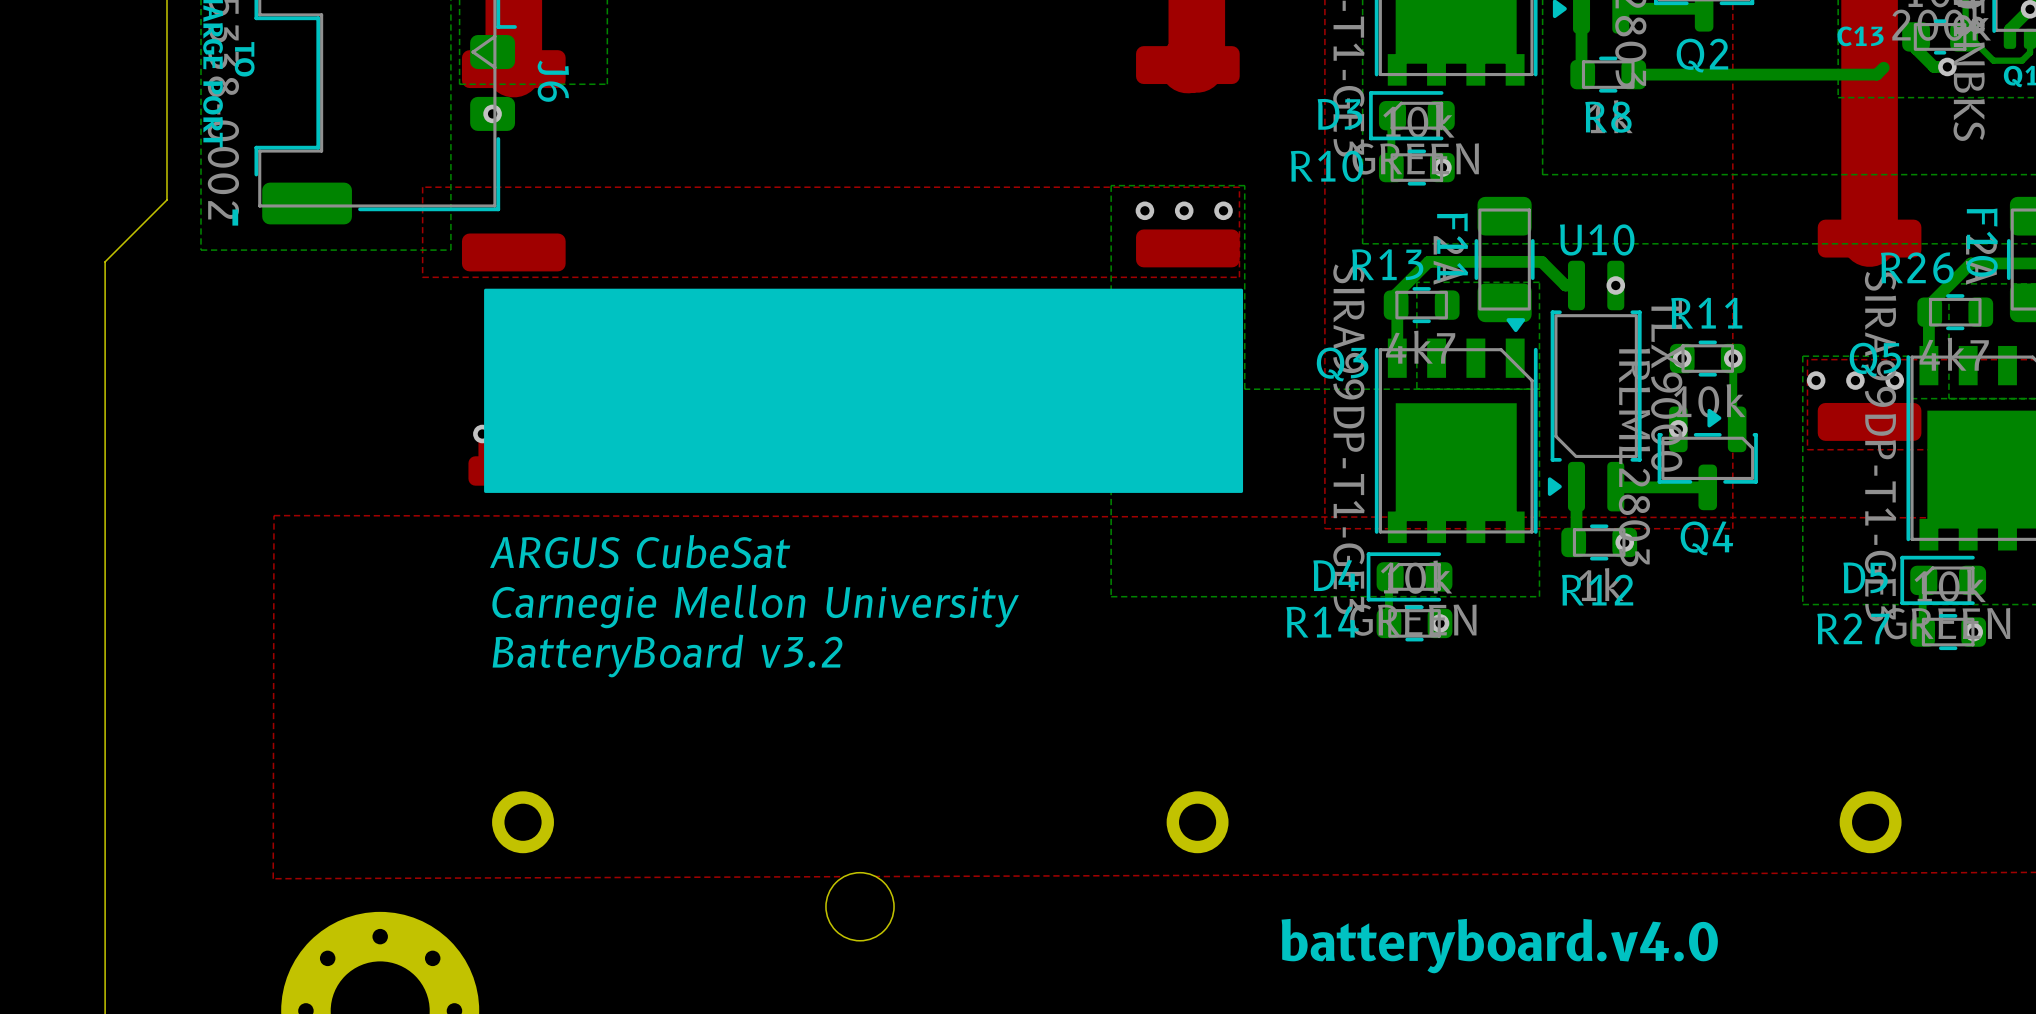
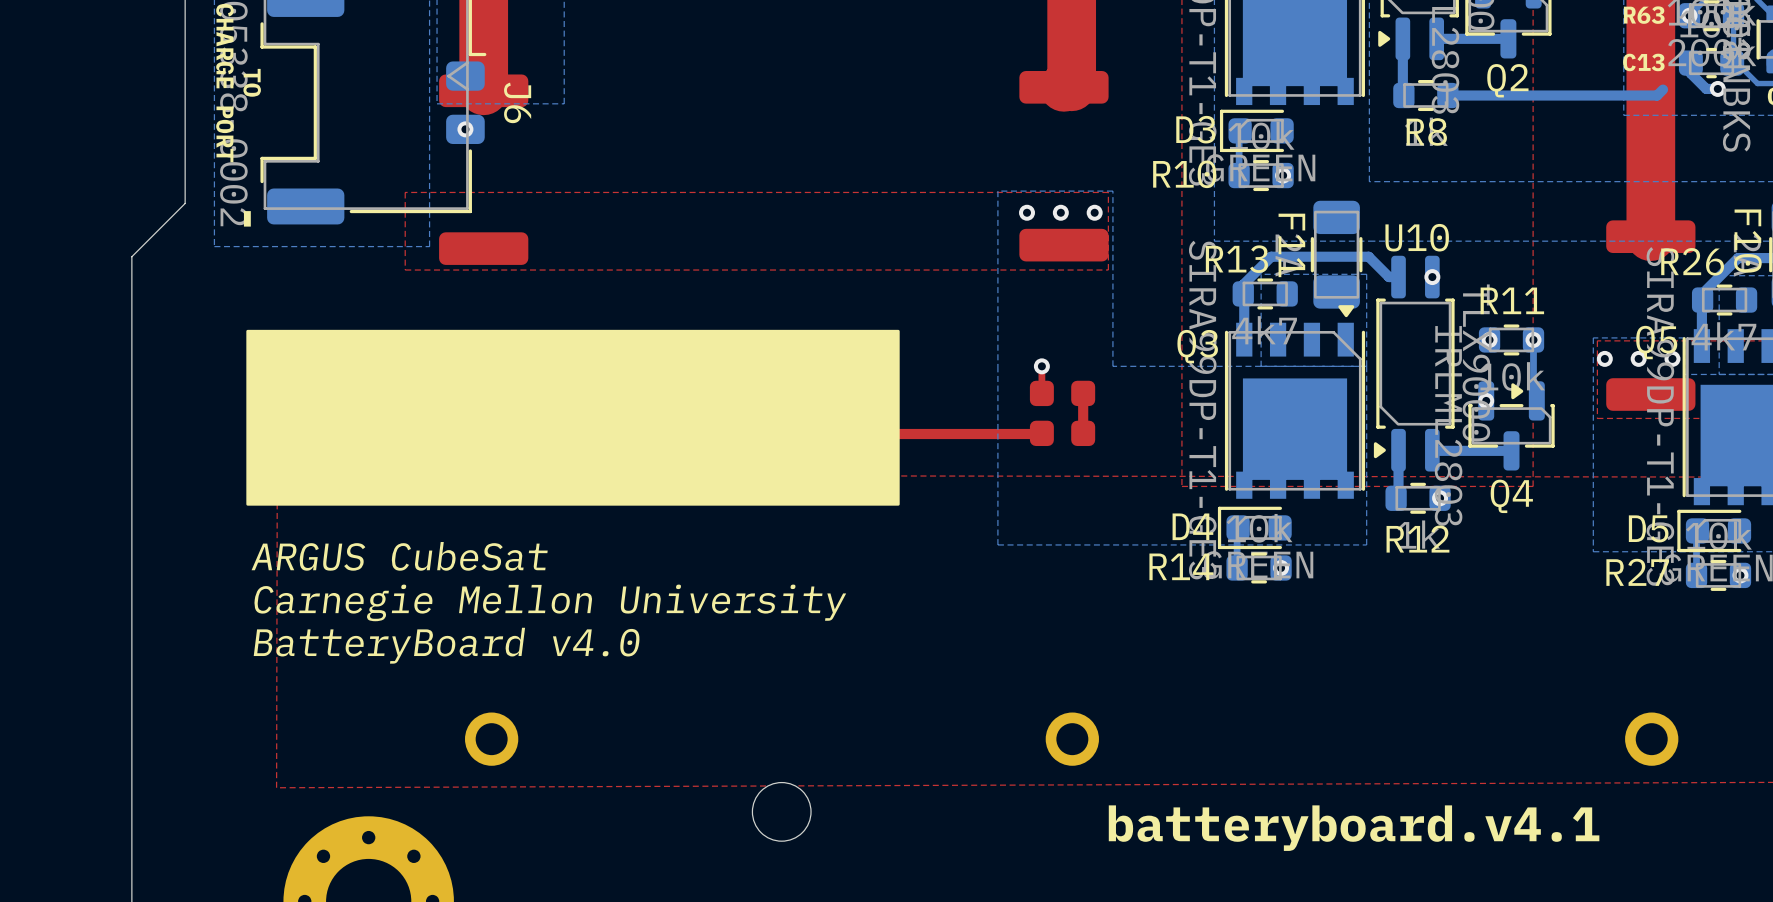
drawing position: (863, 390) -> (573, 417)
text position: ARGUS CubeSat (640, 551) -> ARGUS CubeSat (399, 556)
text position: Carnegie Mellon University (755, 606) -> Carnegie Mellon University (550, 602)
text: BatteryBoard v3.2 (667, 655) -> BatteryBoard v4.0 (446, 645)
text: batteryboard.v4.0 (1499, 946) -> batteryboard.v4.1 (1354, 828)

